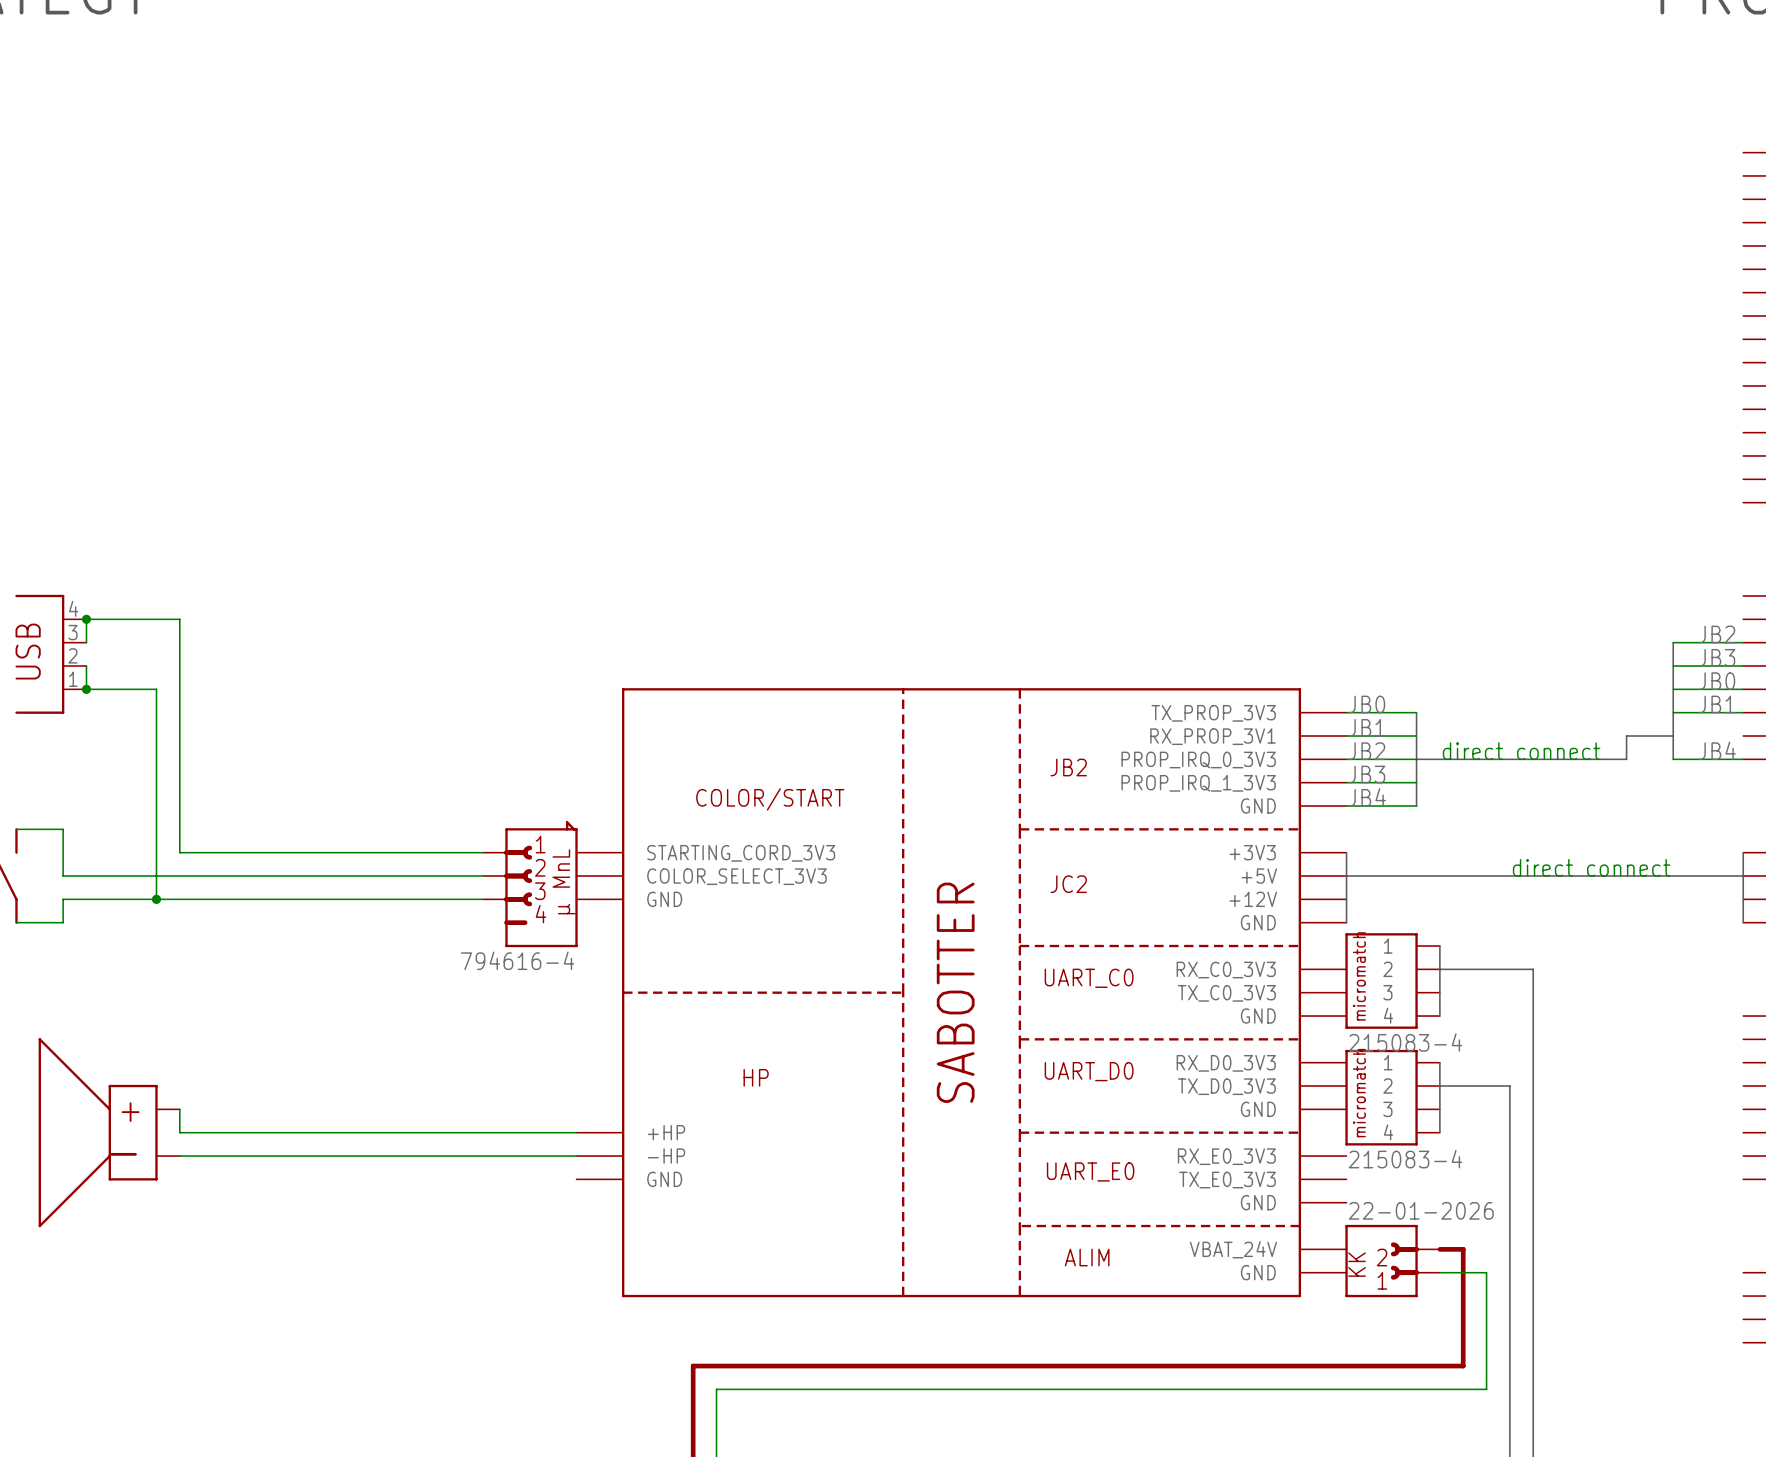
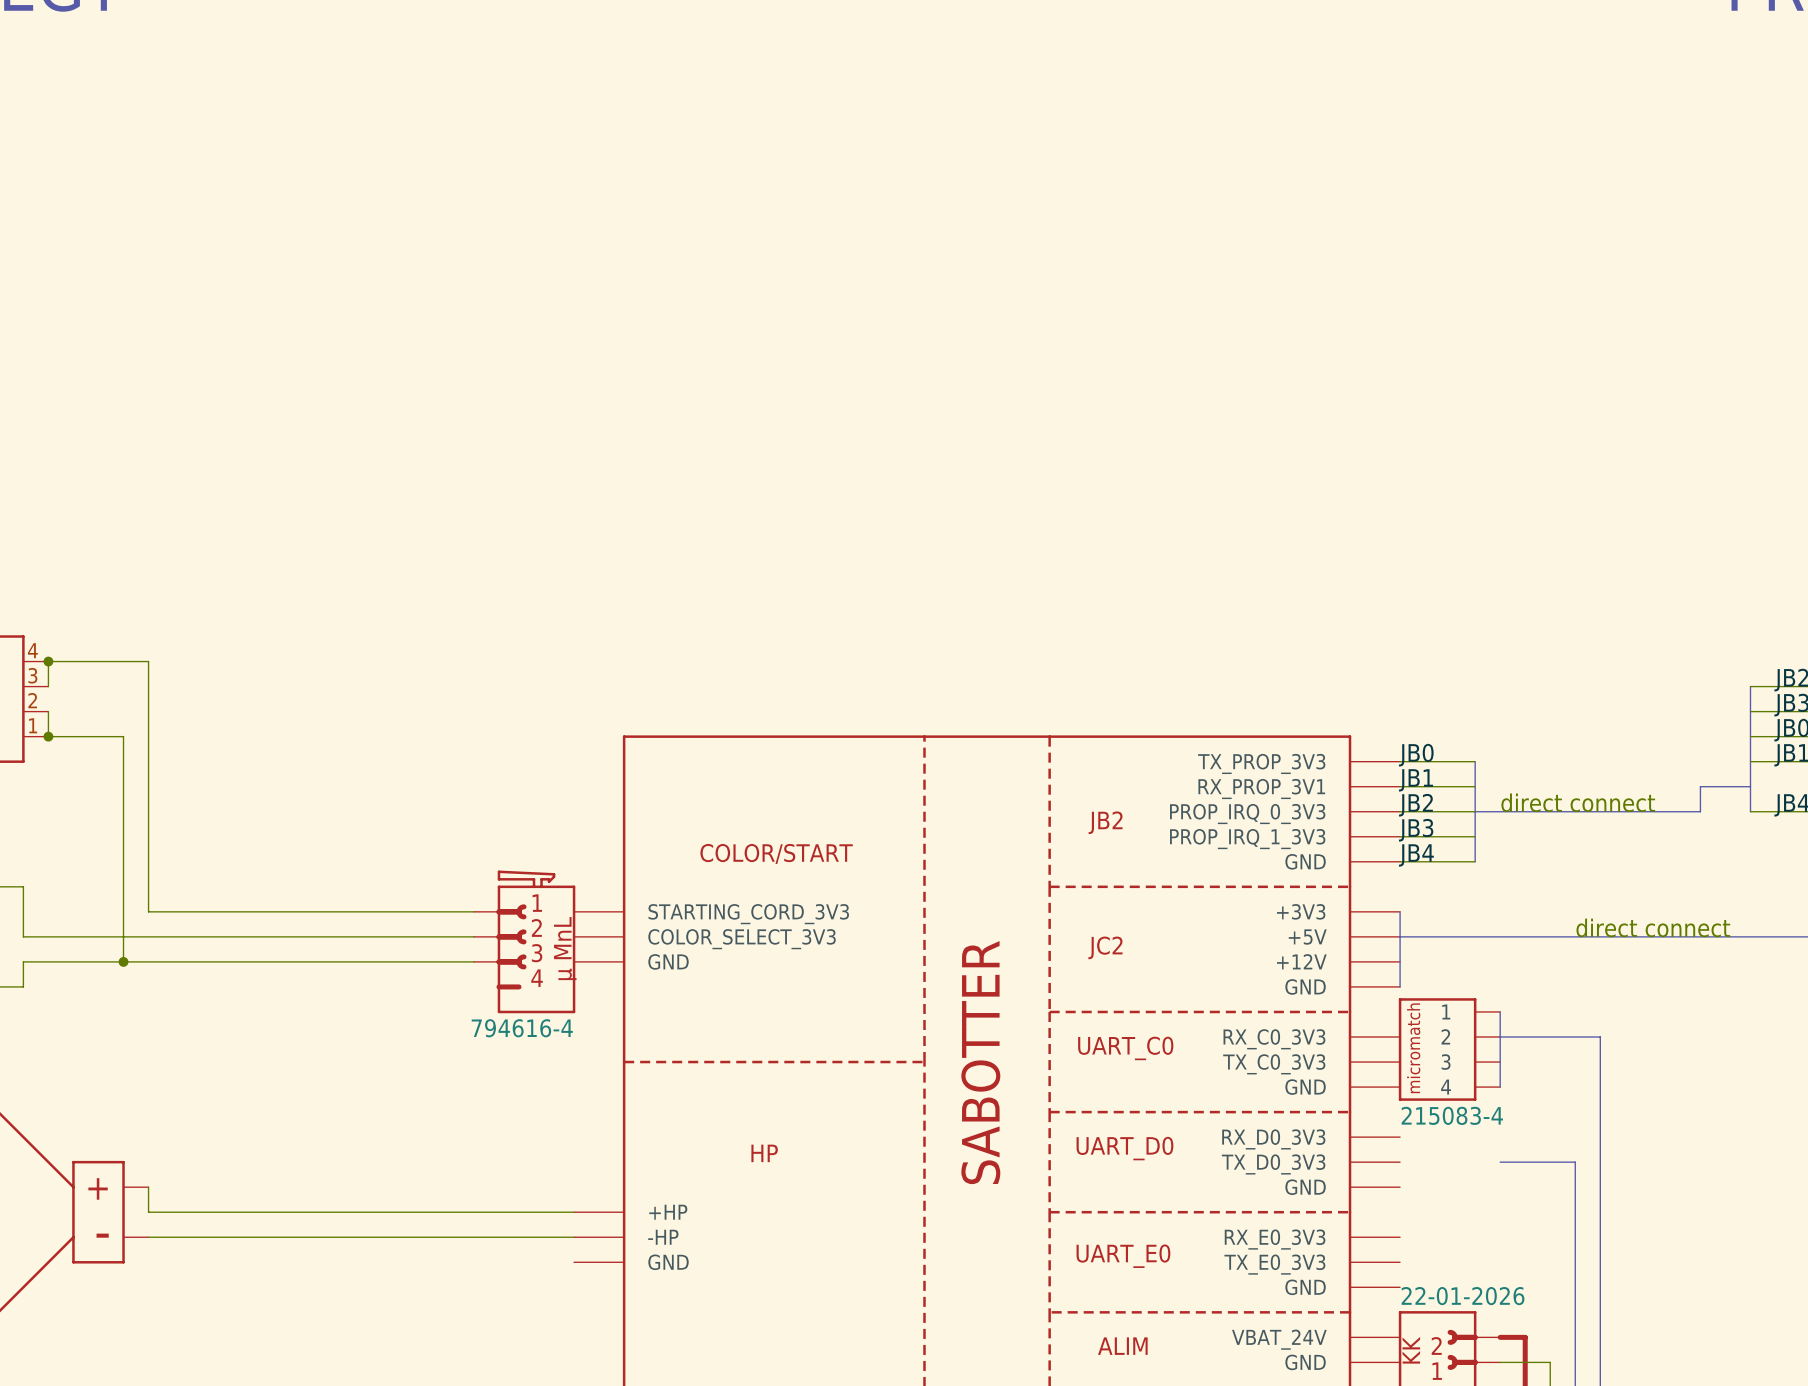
part symbol: [504, 821, 578, 948] -> [496, 870, 576, 1014]
bus: (1439, 1062) (1439, 1132) -> none
part: 215083-4 (1392, 1097) -> none

